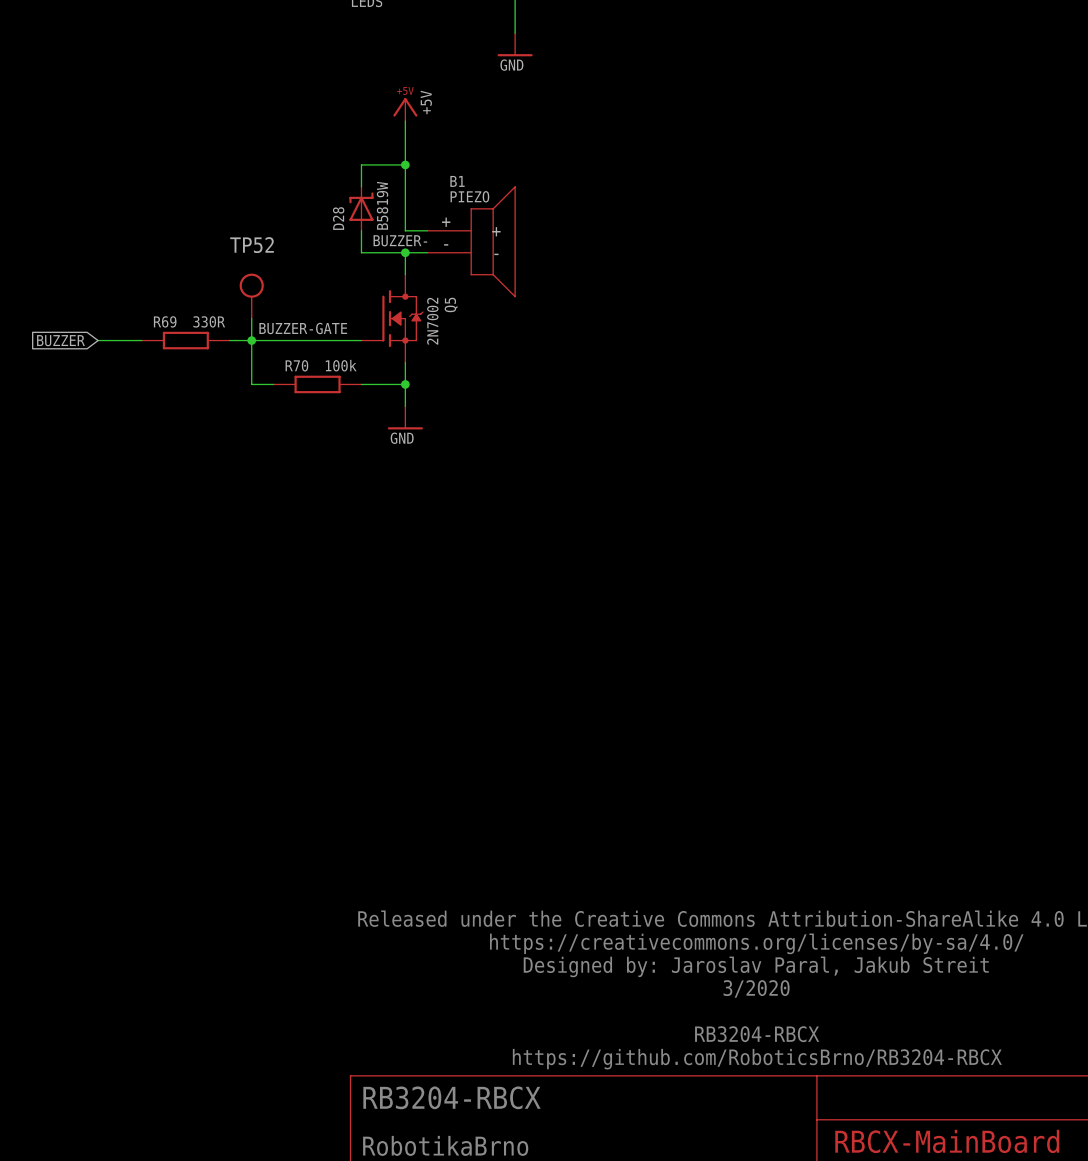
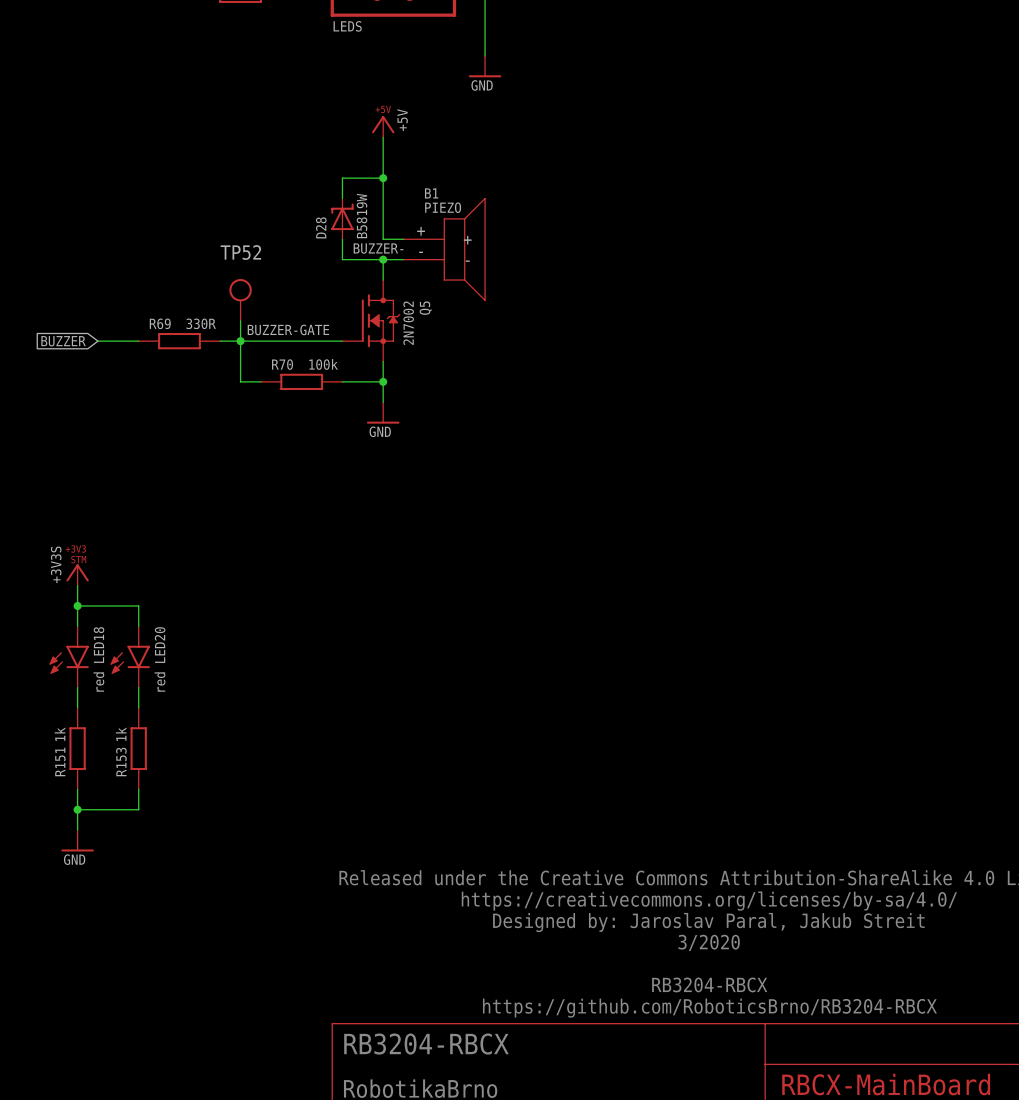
power symbol: none -> +3V3S (77, 574)
wire: none -> (77, 585) (77, 626)
wire: none -> (77, 605) (138, 605) (138, 626)
junction: none -> (77, 605)
LED18: none -> red (69, 656)
LED20: none -> red (130, 656)
wire: none -> (77, 687) (77, 707)
wire: none -> (138, 687) (138, 707)
R151: none -> 1k (77, 748)
R153: none -> 1k (138, 748)
wire: none -> (77, 789) (77, 830)
wire: none -> (138, 789) (138, 809) (77, 809)
junction: none -> (77, 809)
power symbol: none -> GND (77, 840)

